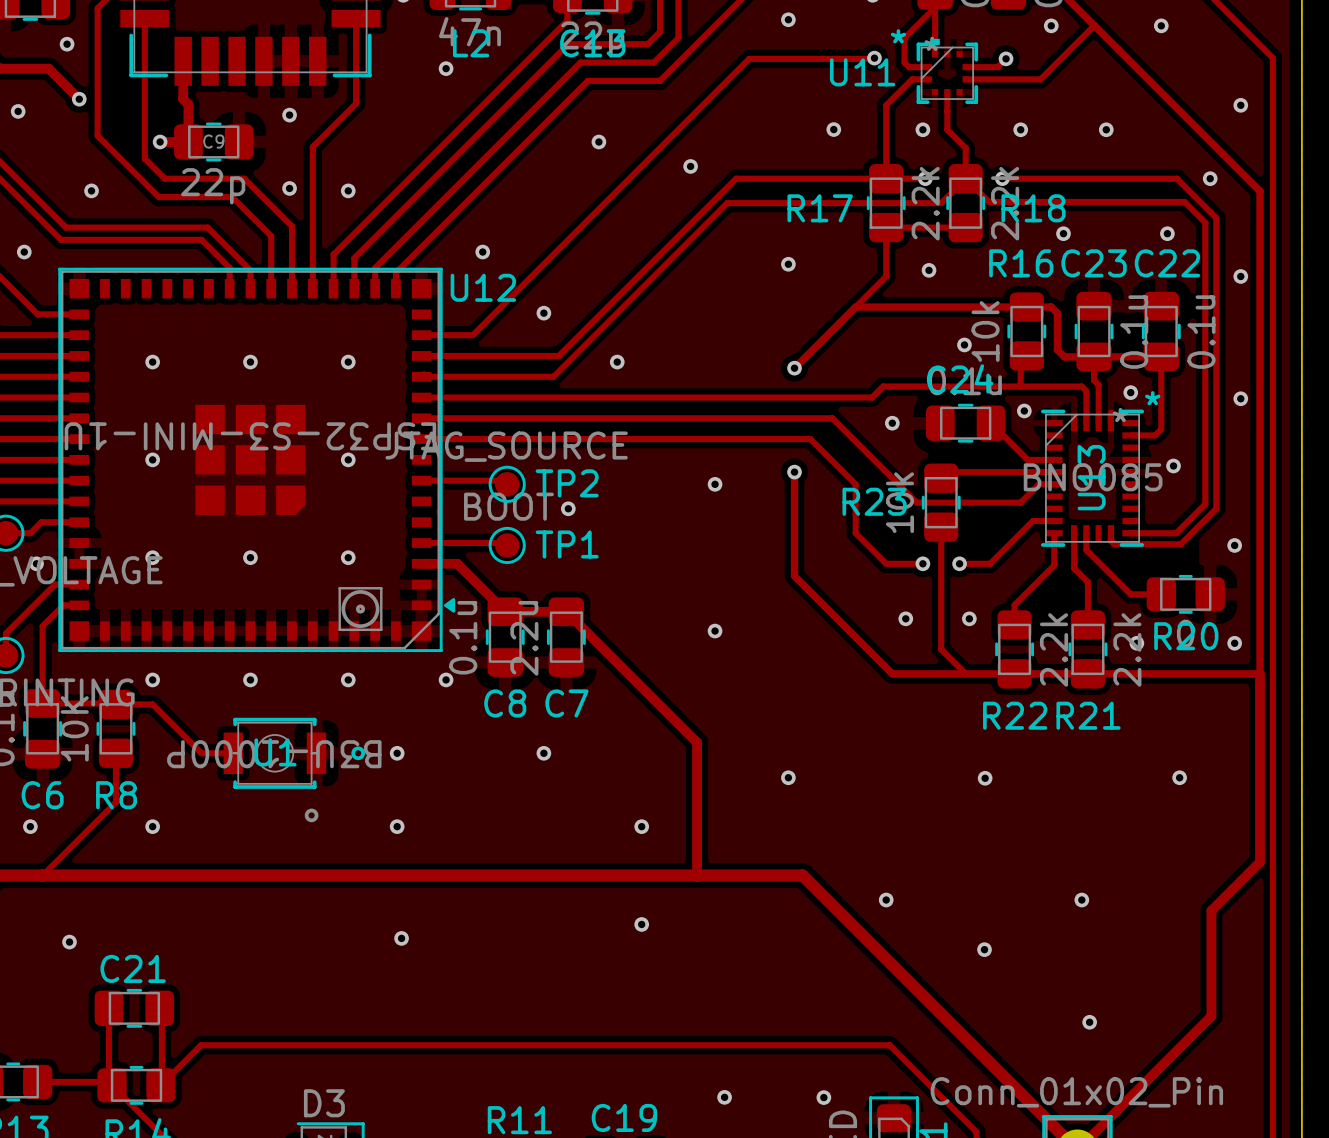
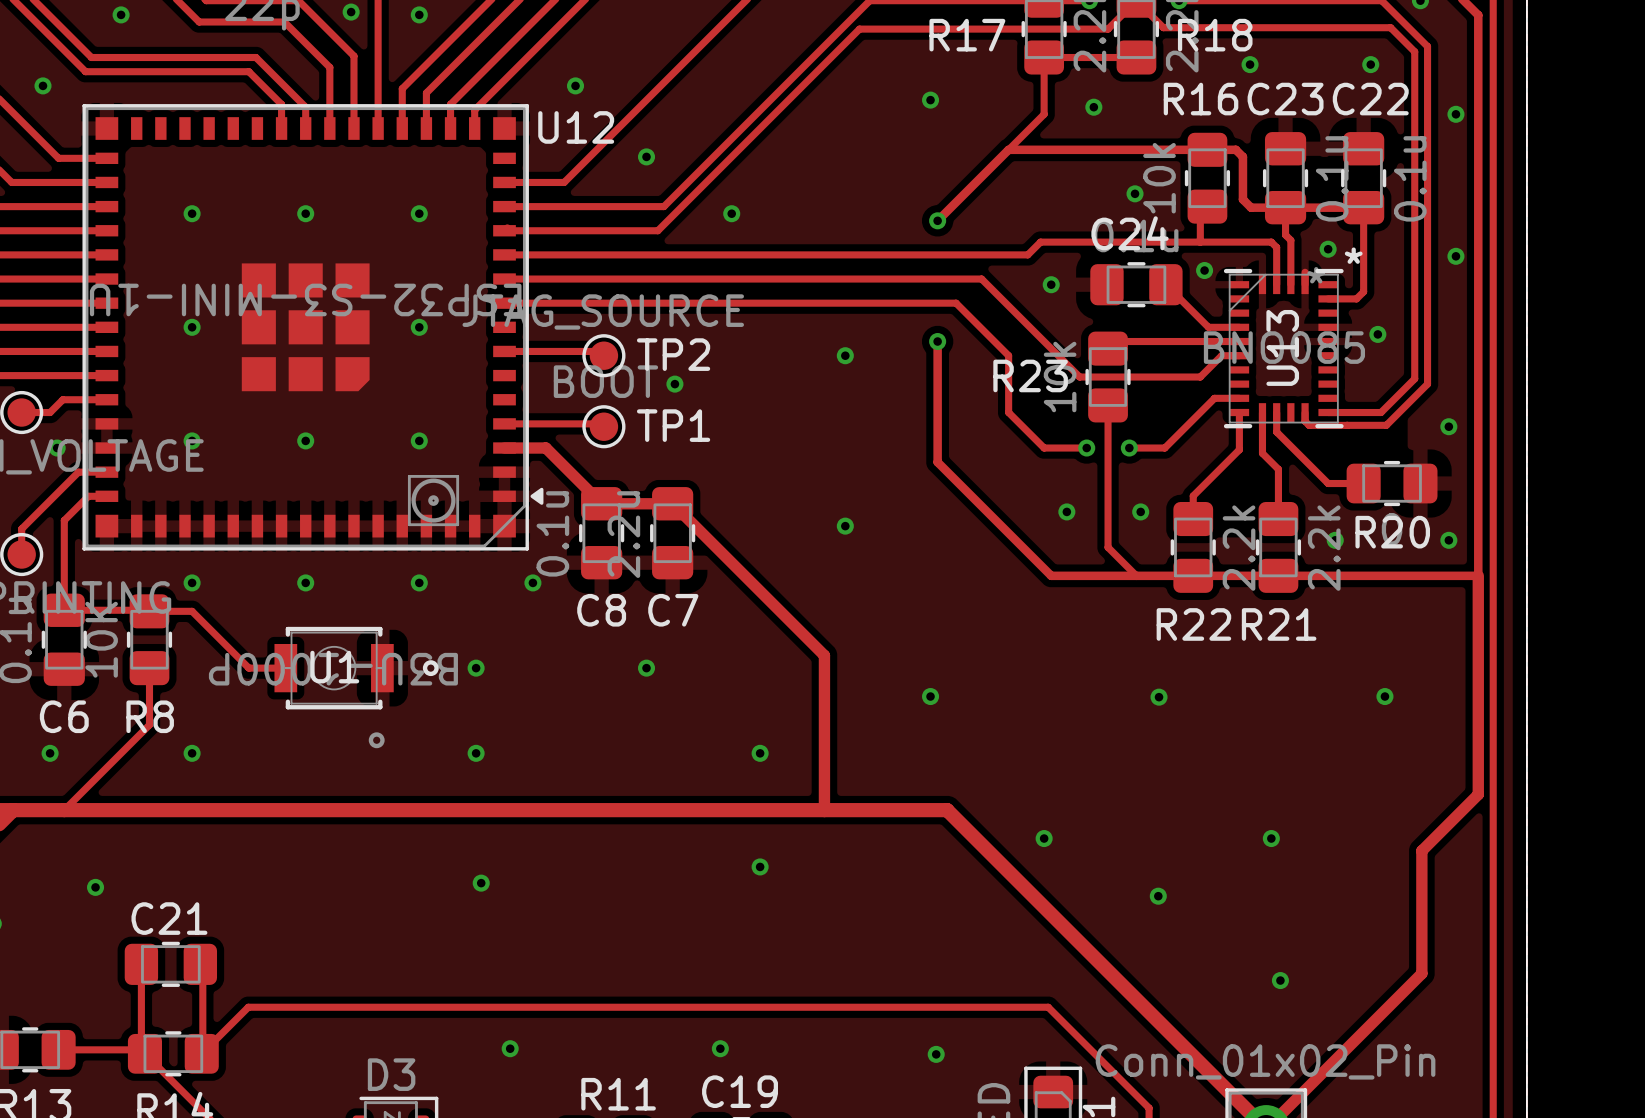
via: none -> (510, 1048)
via: none -> (720, 1048)
via: (724, 1097) -> none
via position: (823, 1097) -> (936, 1054)

